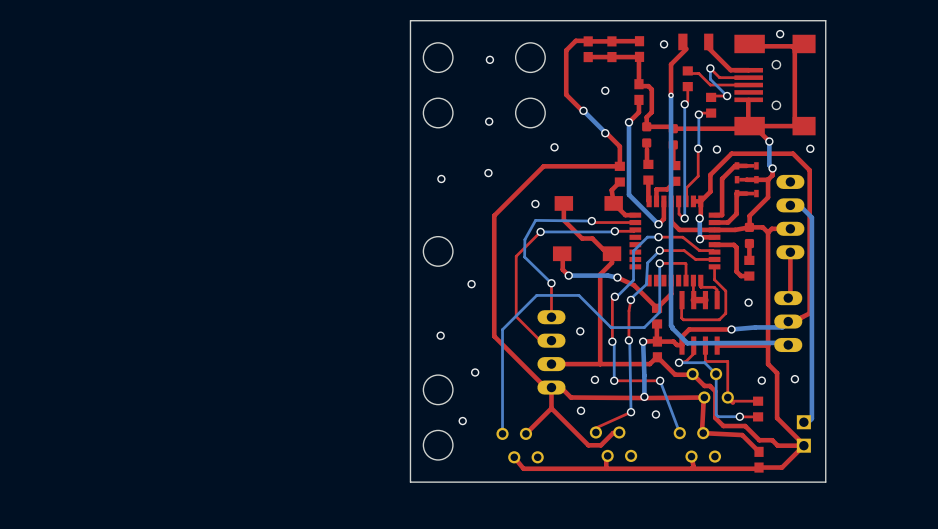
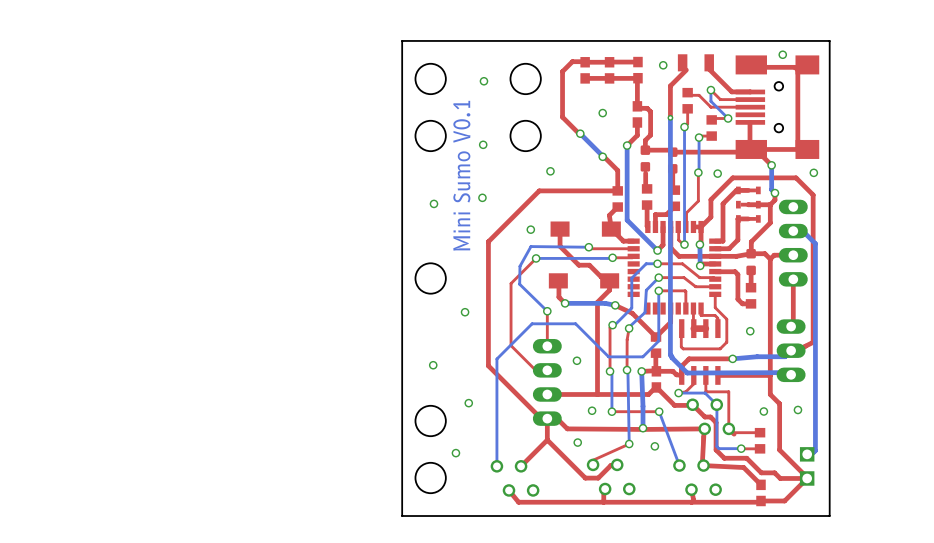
text: none -> Mini Sumo V0.1 (461, 175)

